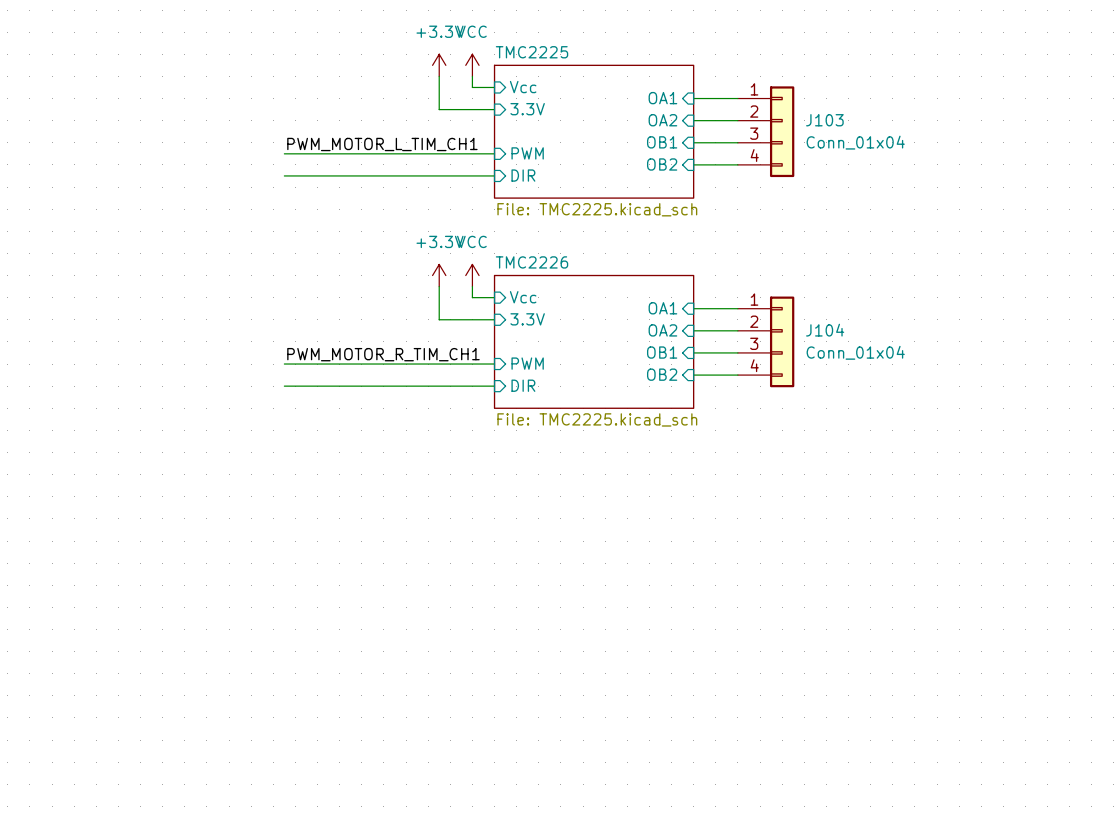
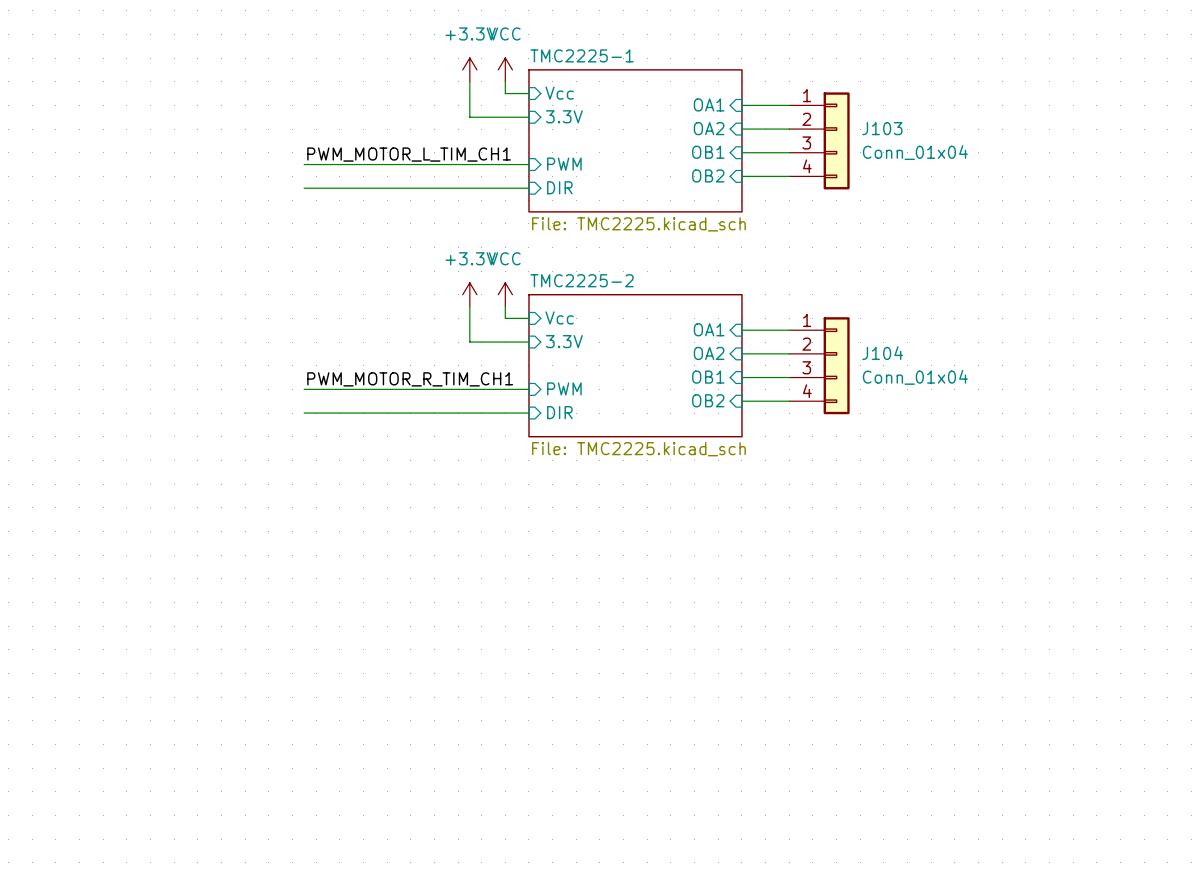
sheet TMC2225 name: TMC2225 (532, 52) -> TMC2225-1 (582, 55)
sheet TMC2226 name: TMC2226 (532, 262) -> TMC2225-2 (582, 280)

